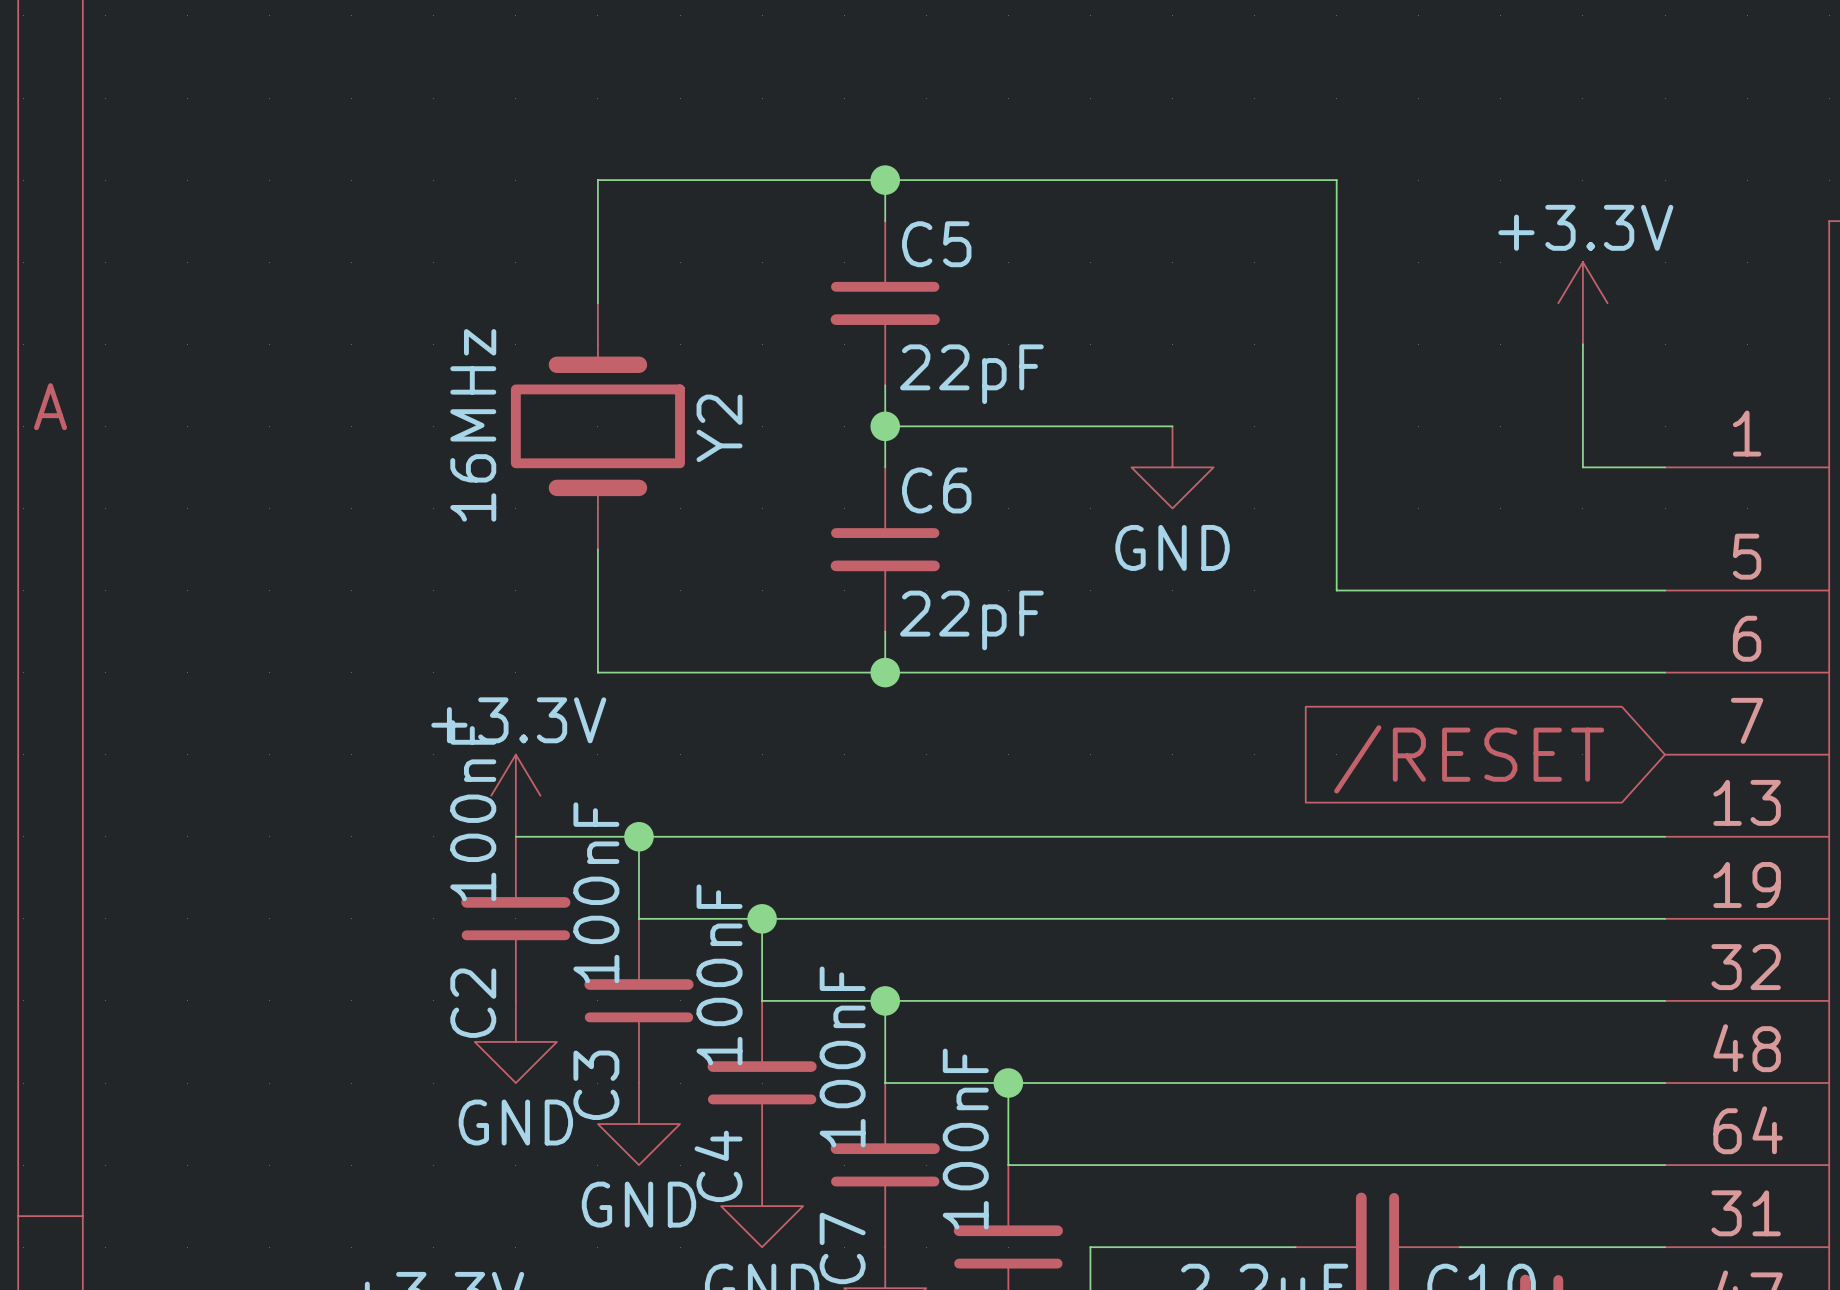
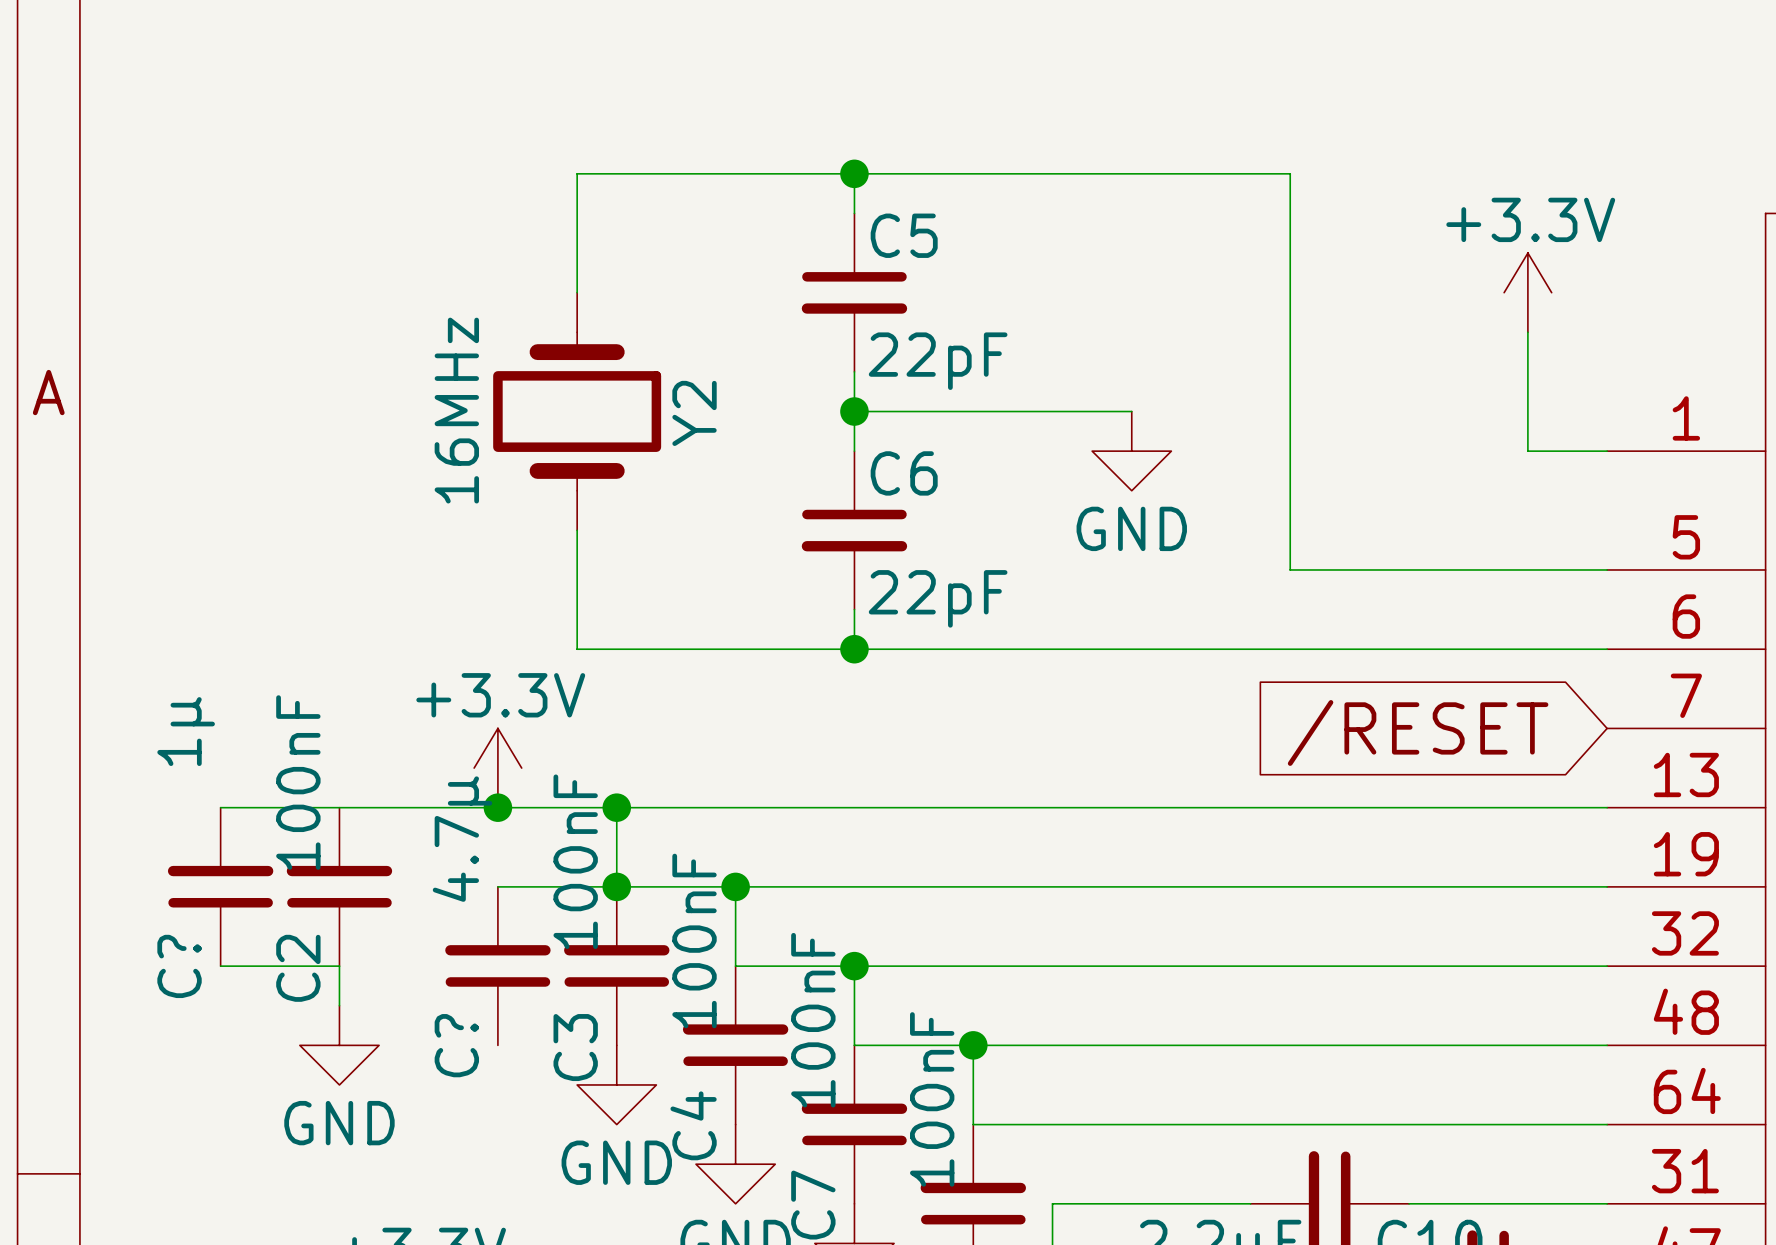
wire: none -> (220, 807) (497, 807)
junction: none -> (497, 807)
C?: none -> 1µ (220, 886)
wire: none -> (497, 886) (616, 886)
C2 position: (515, 918) -> (339, 886)
junction: none -> (616, 886)
wire: none -> (220, 966) (339, 966) (339, 1005)
C?: none -> 4.7µ (497, 966)
power symbol position: GND (515, 1041) -> GND (339, 1045)

